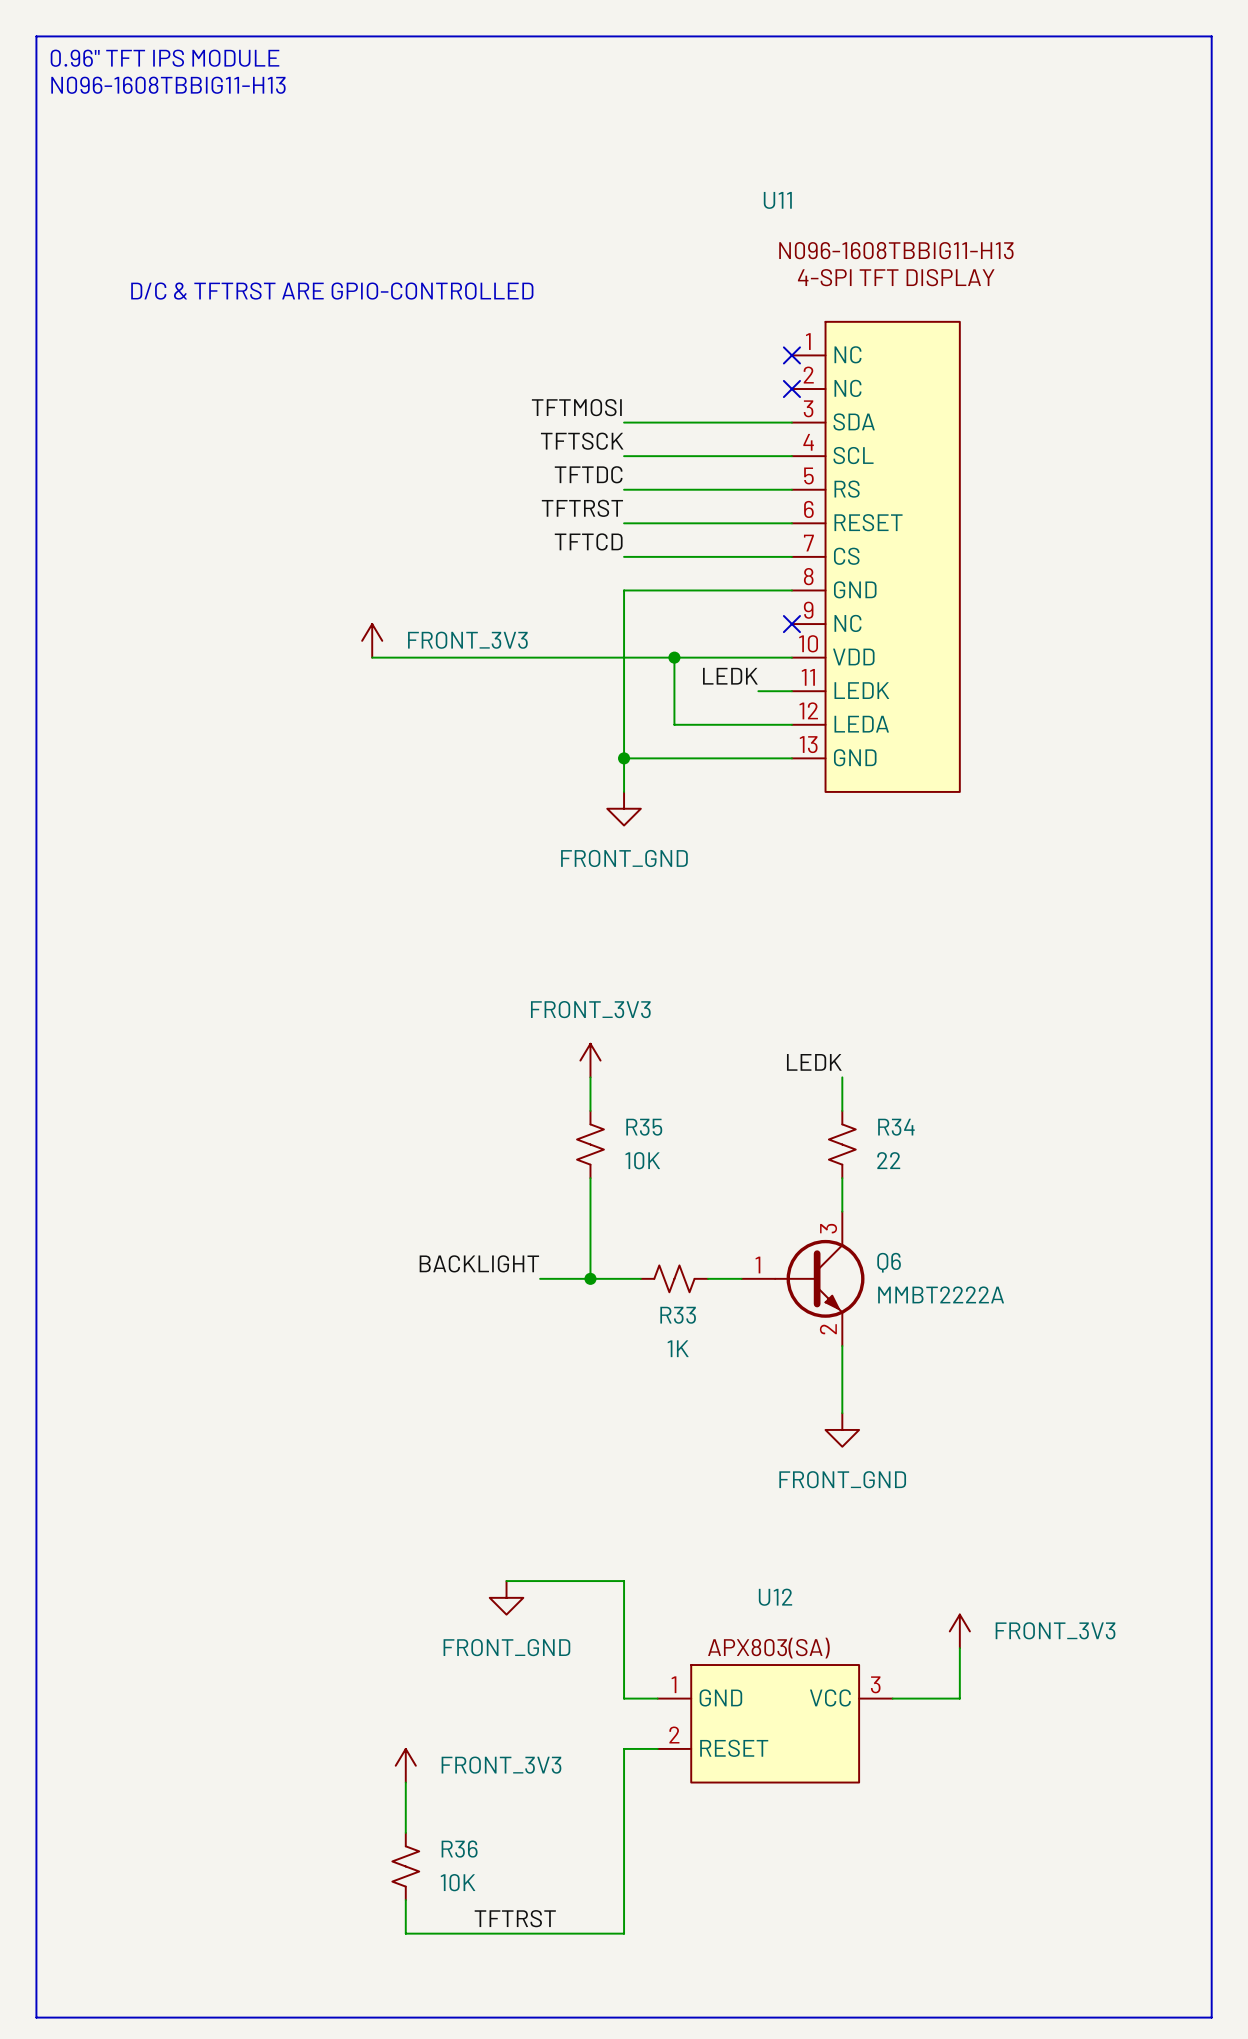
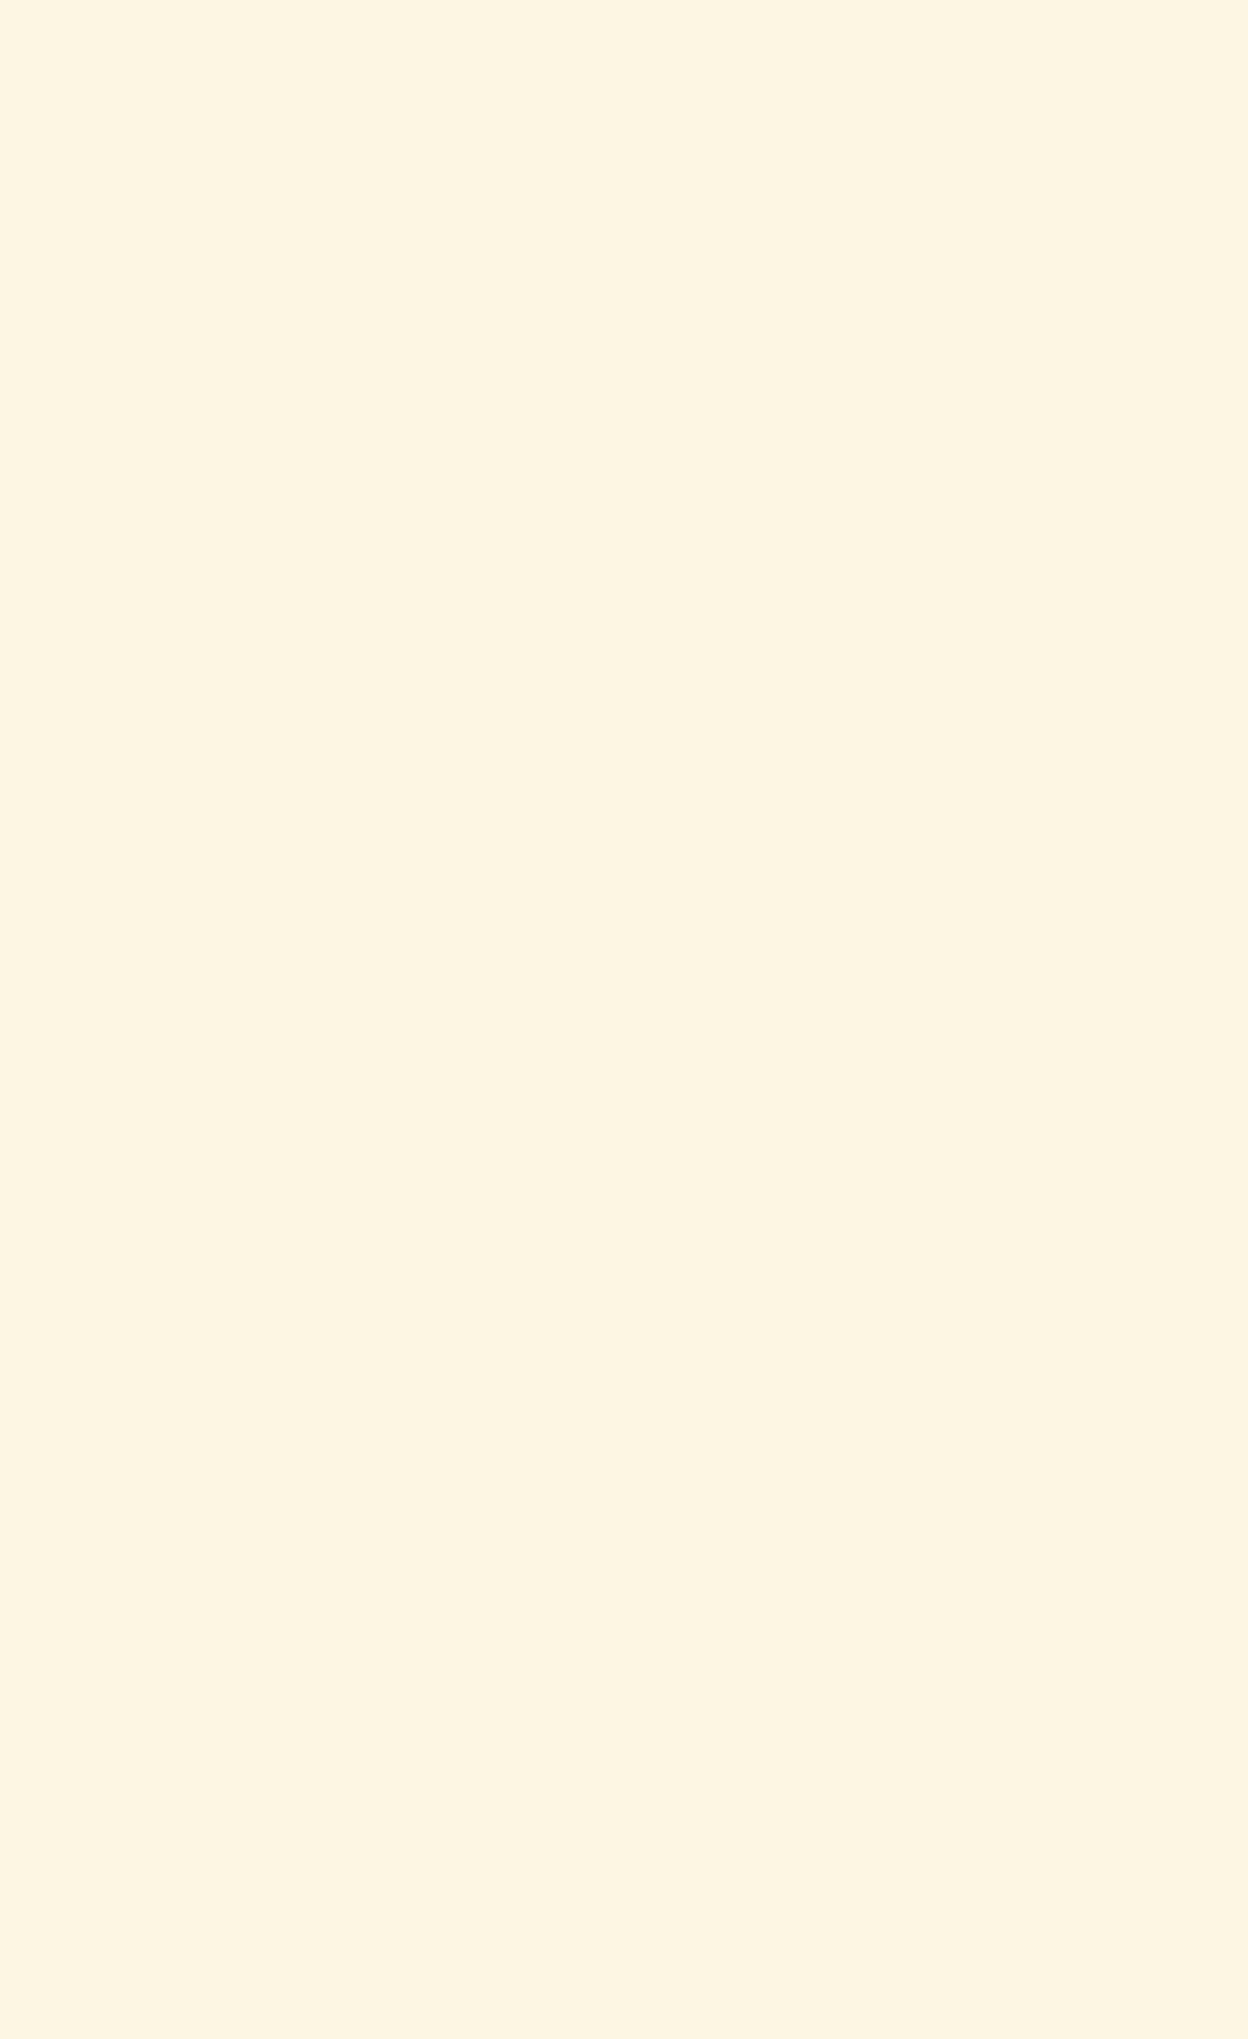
line: (36, 36) (1211, 36) (1211, 2017) (36, 2017) (36, 36) -> none
text: 0.96" TFT IPS MODULE (165, 58) -> none
text: N096-1608TBBIG11-H13 (168, 85) -> none
text: D/C & TFTRST ARE GPIO-CONTROLLED (332, 291) -> none
no-connect mark: (791, 355) -> none
no-connect mark: (791, 389) -> none
label: TFTMOSI (576, 407) -> none
wire: (624, 422) (791, 422) -> none
label: TFTSCK (582, 441) -> none
wire: (624, 456) (791, 456) -> none
label: TFTDC (588, 474) -> none
wire: (624, 489) (791, 489) -> none
label: TFTRST (582, 508) -> none
wire: (624, 523) (791, 523) -> none
label: TFTCD (588, 541) -> none
wire: (624, 556) (791, 556) -> none
U11: (875, 556) -> none
wire: (791, 590) (624, 590) (624, 791) -> none
no-connect mark: (791, 624) -> none
power symbol: FRONT_3V3 (372, 640) -> none
wire: (372, 657) (791, 657) -> none
wire: (674, 657) (674, 724) (791, 724) -> none
junction: (674, 657) -> none
label: LEDK (730, 676) -> none
wire: (758, 691) (791, 691) -> none
wire: (624, 758) (791, 758) -> none
junction: (624, 758) -> none
power symbol: FRONT_GND (624, 808) -> none
power symbol: FRONT_3V3 (590, 1060) -> none
label: LEDK (814, 1062) -> none
wire: (590, 1077) (590, 1110) -> none
wire: (842, 1077) (842, 1110) -> none
R35: 10K (590, 1144) -> none
R34: 22 (842, 1144) -> none
wire: (590, 1178) (590, 1278) -> none
wire: (842, 1178) (842, 1211) -> none
label: BACKLIGHT (479, 1263) -> none
wire: (540, 1278) (640, 1278) -> none
junction: (590, 1278) -> none
R33: 1K (674, 1278) -> none
wire: (708, 1278) (741, 1278) -> none
Q6: MMBT2222A (803, 1278) -> none
wire: (842, 1346) (842, 1413) -> none
power symbol: FRONT_GND (842, 1429) -> none
wire: (506, 1581) (624, 1581) (624, 1698) (657, 1698) -> none
power symbol: FRONT_GND (506, 1597) -> none
power symbol: FRONT_3V3 (959, 1631) -> none
wire: (959, 1648) (959, 1698) (892, 1698) -> none
U12: (775, 1723) -> none
wire: (657, 1748) (624, 1748) (624, 1933) (405, 1933) (405, 1900) -> none
power symbol: FRONT_3V3 (405, 1765) -> none
wire: (405, 1782) (405, 1832) -> none
R36: 10K (405, 1866) -> none
label: TFTRST (515, 1918) -> none

